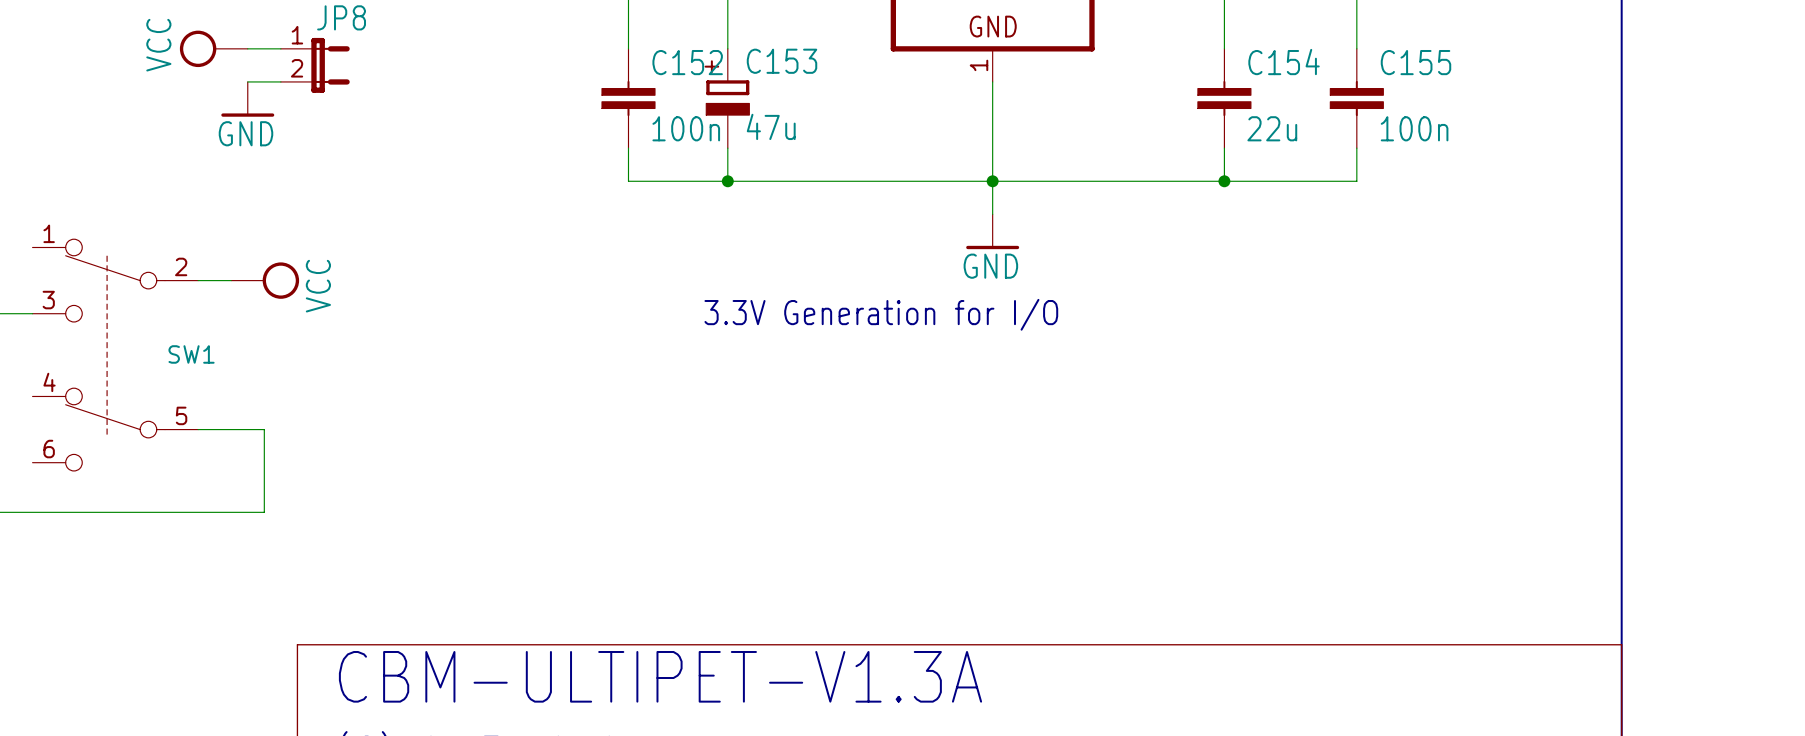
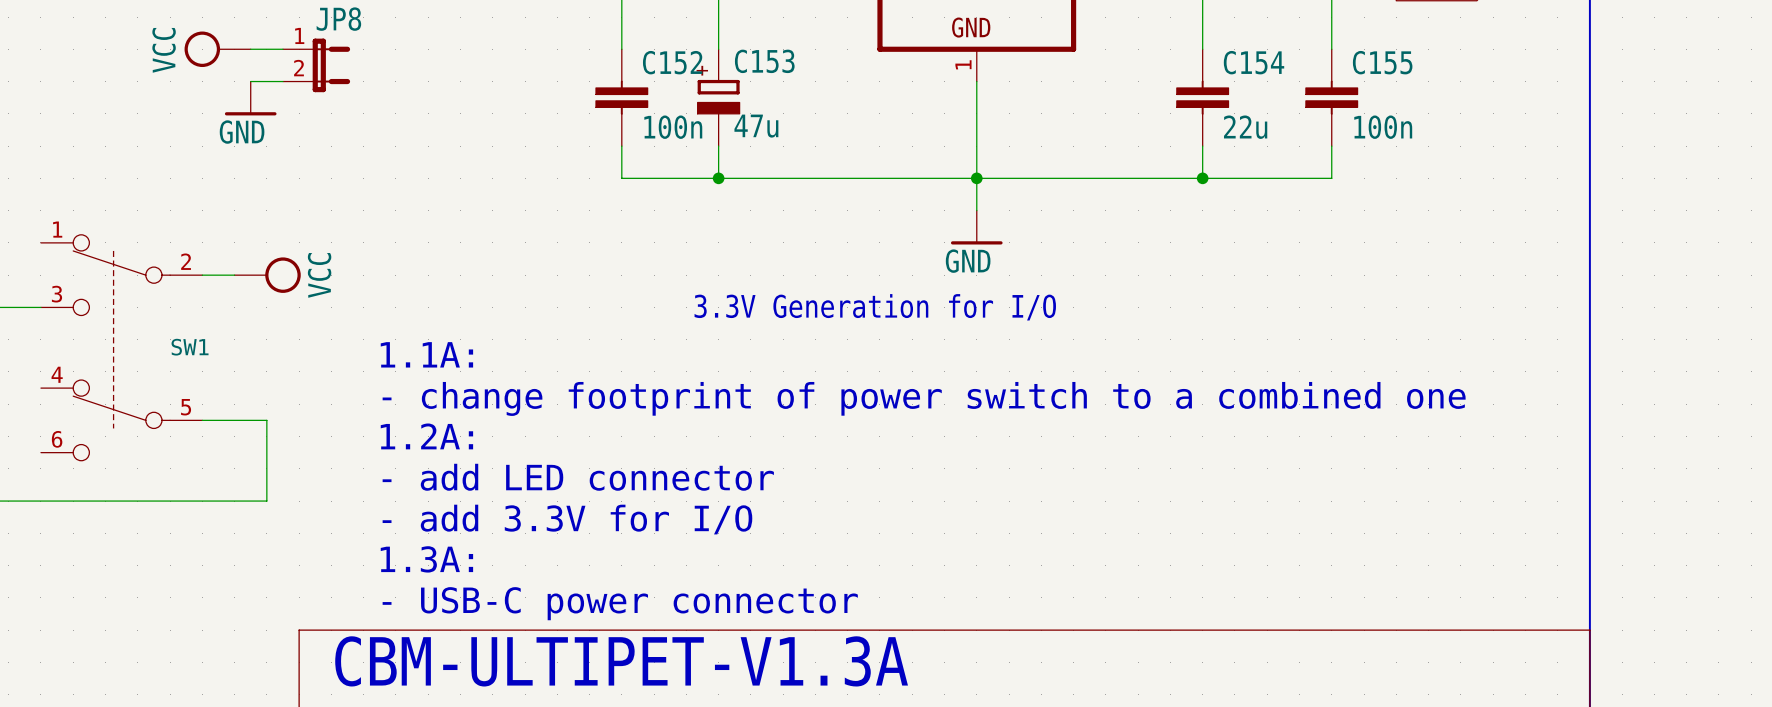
text: none -> 1.1A: (426, 354)
text: none -> - change footprint of power switch to a combined one (924, 398)
text: none -> 1.2A: (426, 436)
text: none -> - add LED connector (578, 477)
text: none -> - add 3.3V for I/O (567, 519)
text: none -> 1.3A: (426, 559)
text: none -> - USB-C power connector (620, 603)

